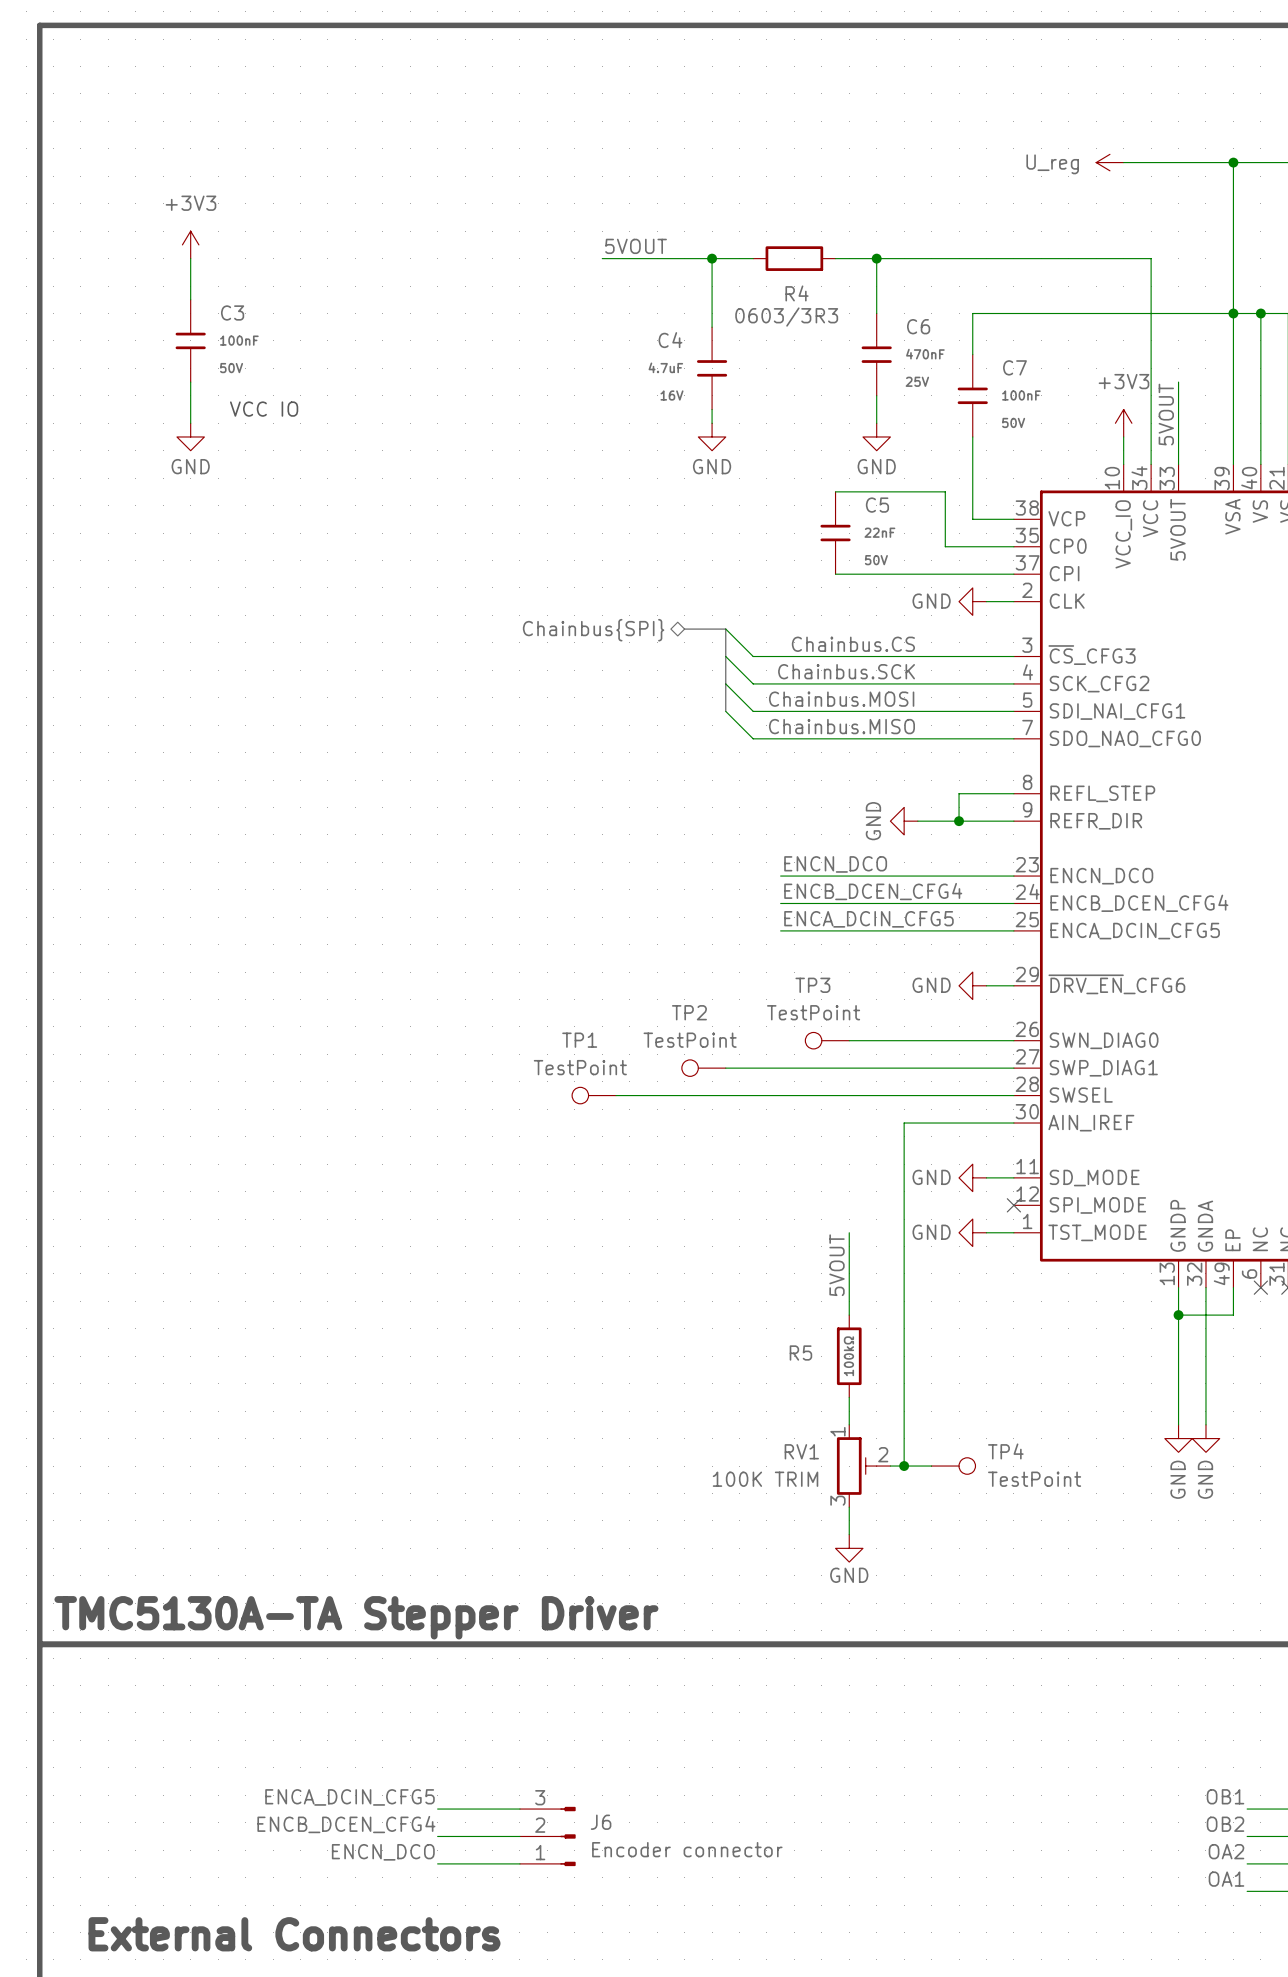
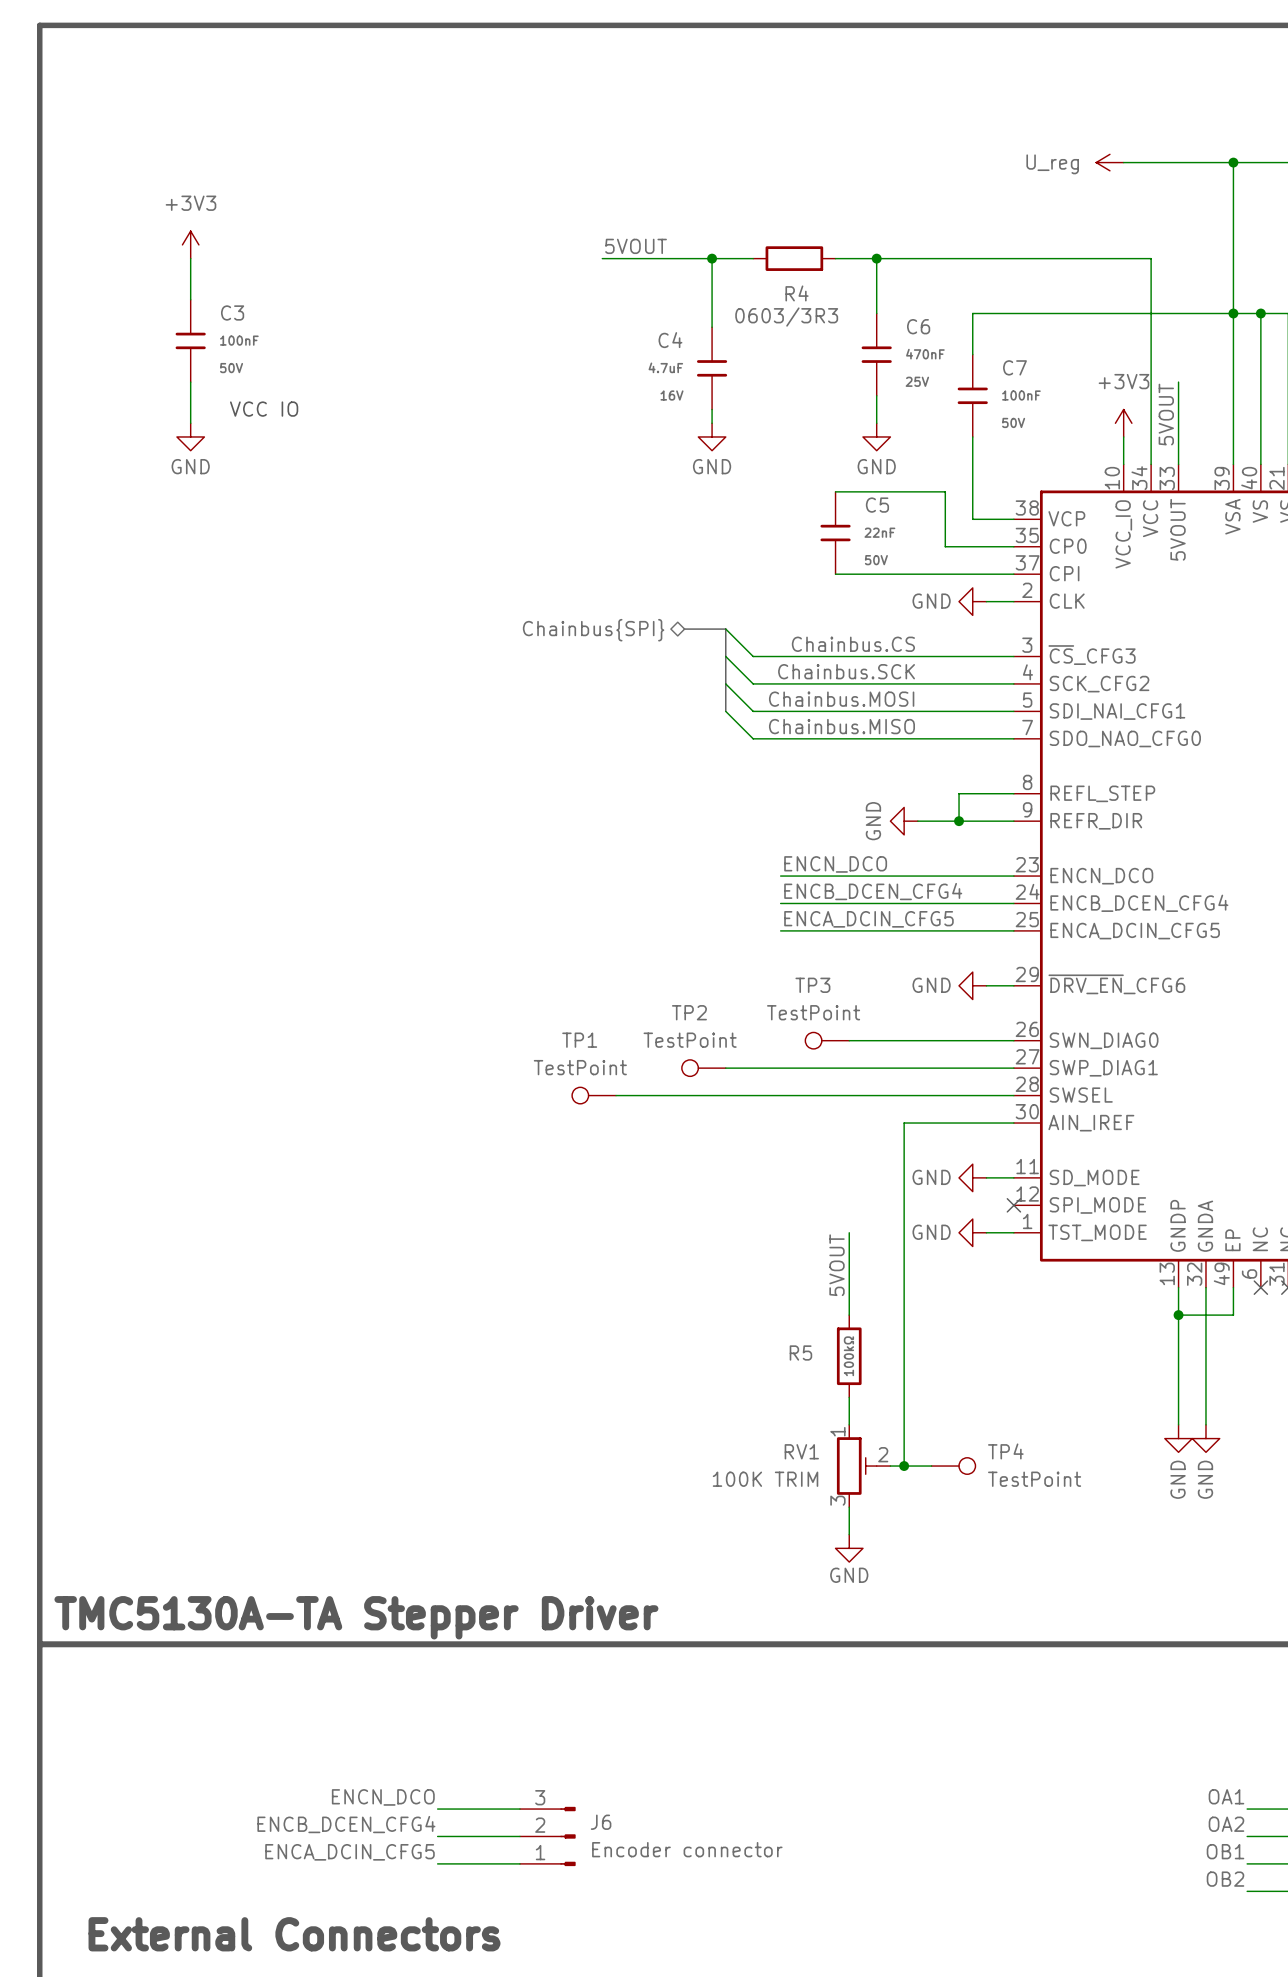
label: OB1 (1225, 1796) -> OA1 (1226, 1796)
label: ENCA_DCIN_CFG5 (349, 1797) -> ENCN_DCO (383, 1797)
label: OB2 (1225, 1824) -> OA2 (1226, 1824)
label: OA2 (1226, 1851) -> OB1 (1225, 1851)
label: ENCN_DCO (383, 1852) -> ENCA_DCIN_CFG5 (349, 1852)
label: OA1 (1226, 1879) -> OB2 (1225, 1879)

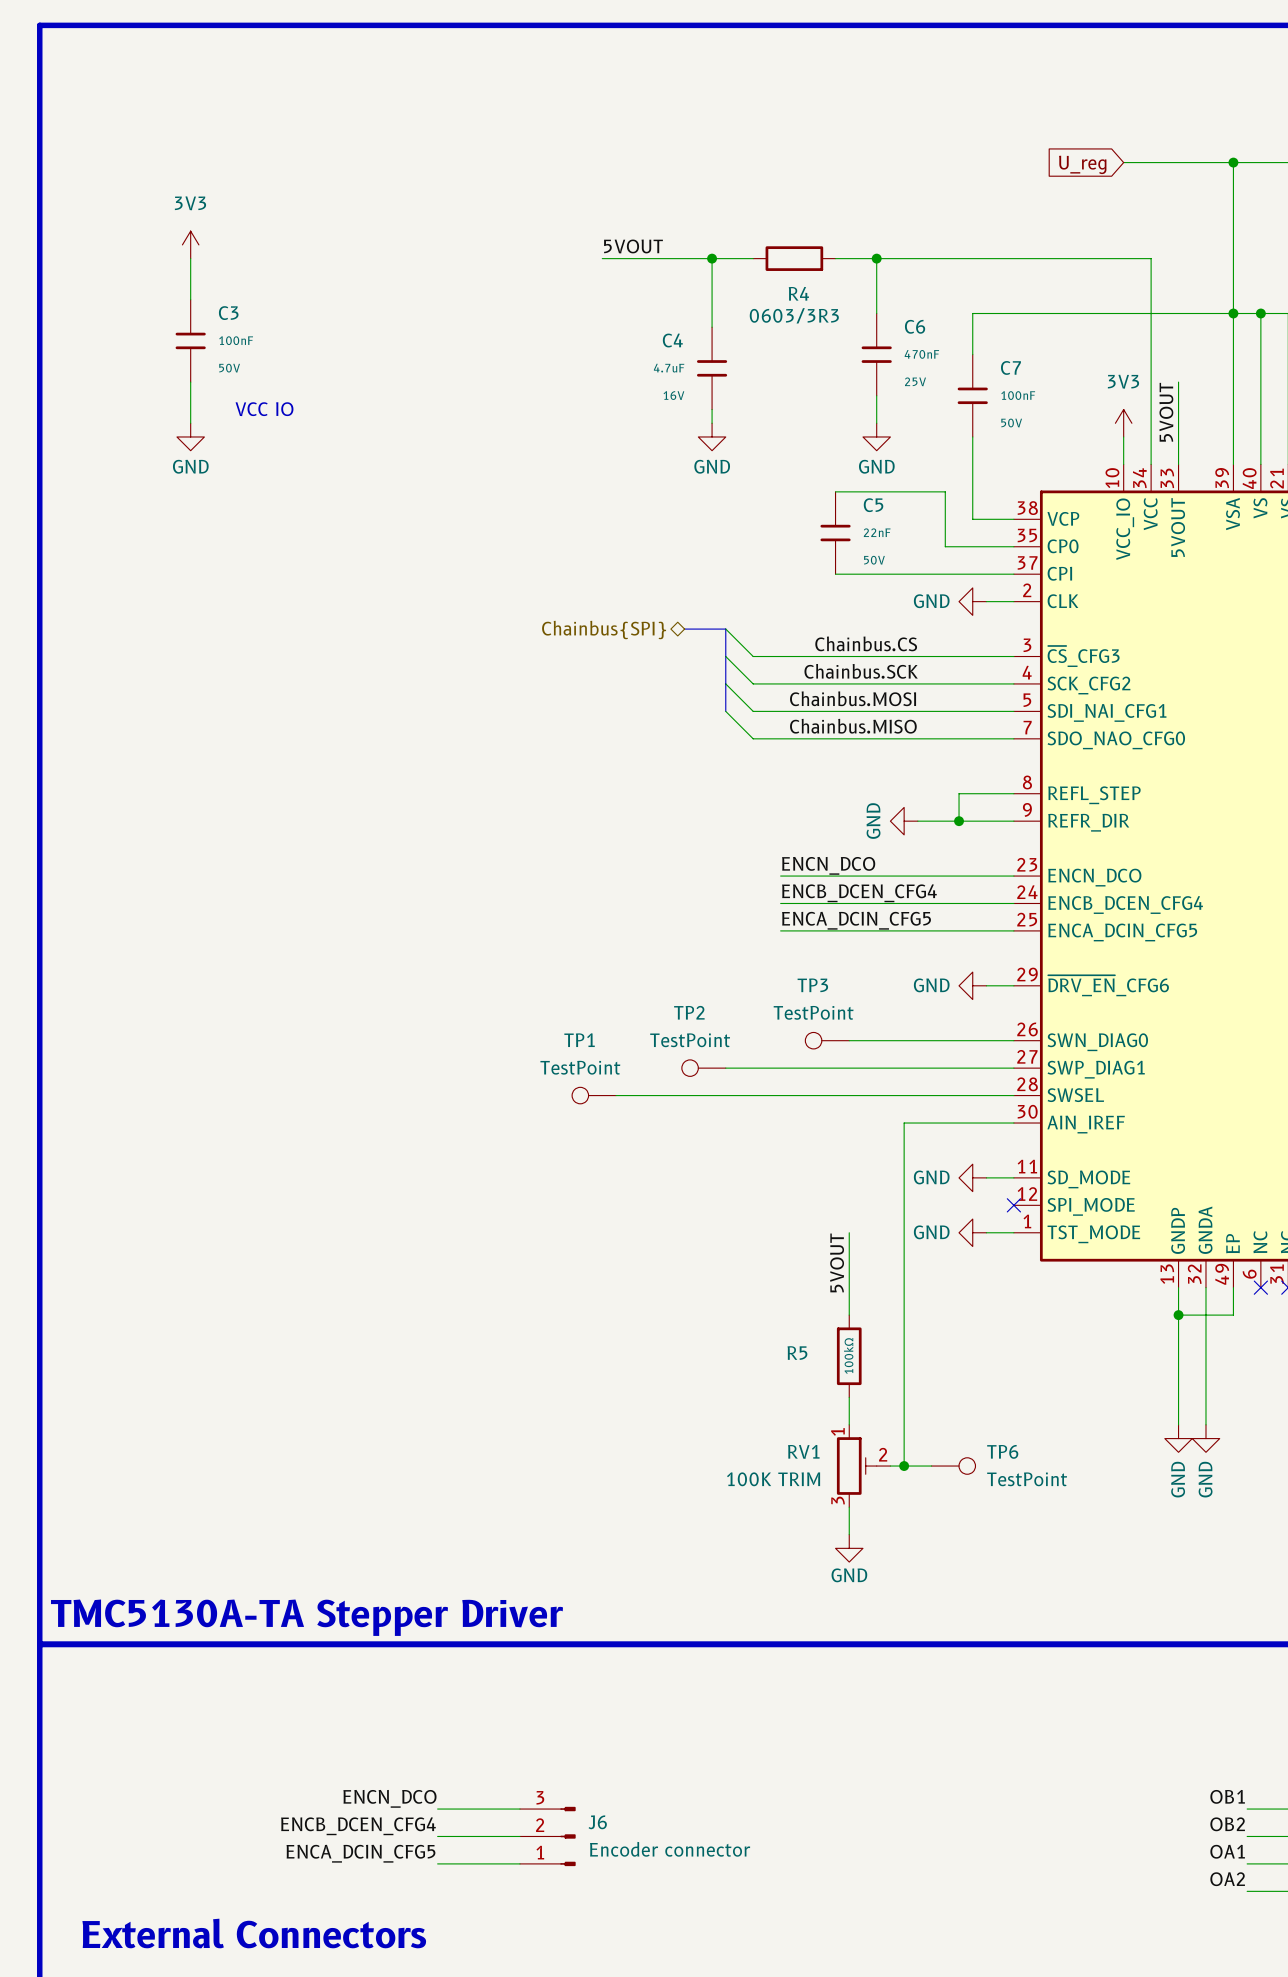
power symbol: U_reg (1109, 162) -> none
global label: none -> U_reg (1082, 164)
power symbol: +3V3 (190, 244) -> 3V3 (190, 244)
power symbol: +3V3 (1123, 423) -> 3V3 (1123, 423)
TP4 name: TP4 (1005, 1451) -> TP6 (1002, 1451)
label: OA1 (1226, 1796) -> OB1 (1227, 1796)
label: OA2 (1226, 1824) -> OB2 (1227, 1824)
label: OB1 (1225, 1851) -> OA1 (1227, 1851)
label: OB2 (1225, 1879) -> OA2 (1227, 1879)

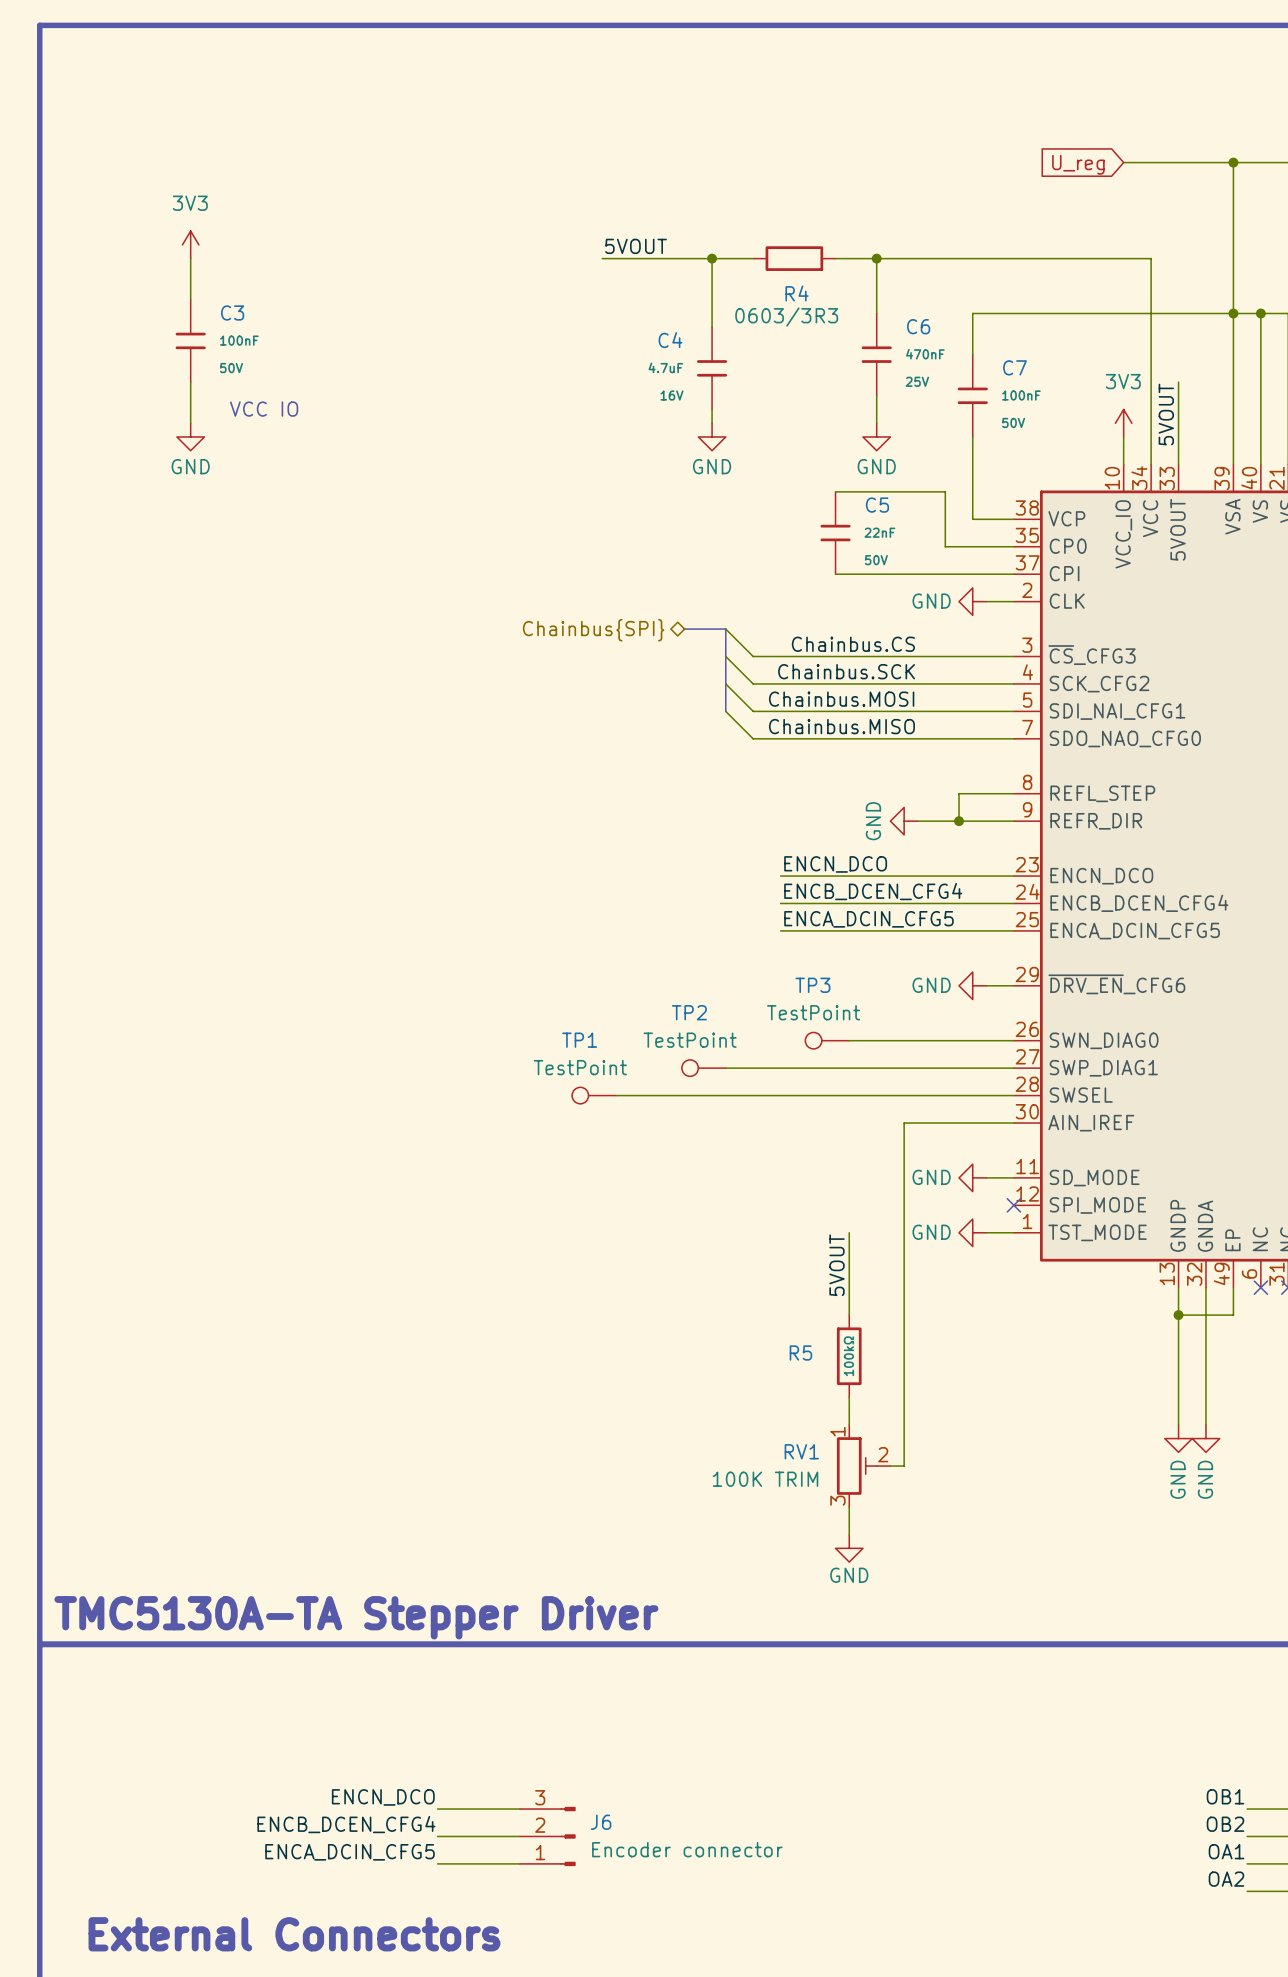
wire: (904, 1466) (931, 1466) -> none
junction: (904, 1466) -> none
TP6: TestPoint (953, 1466) -> none

